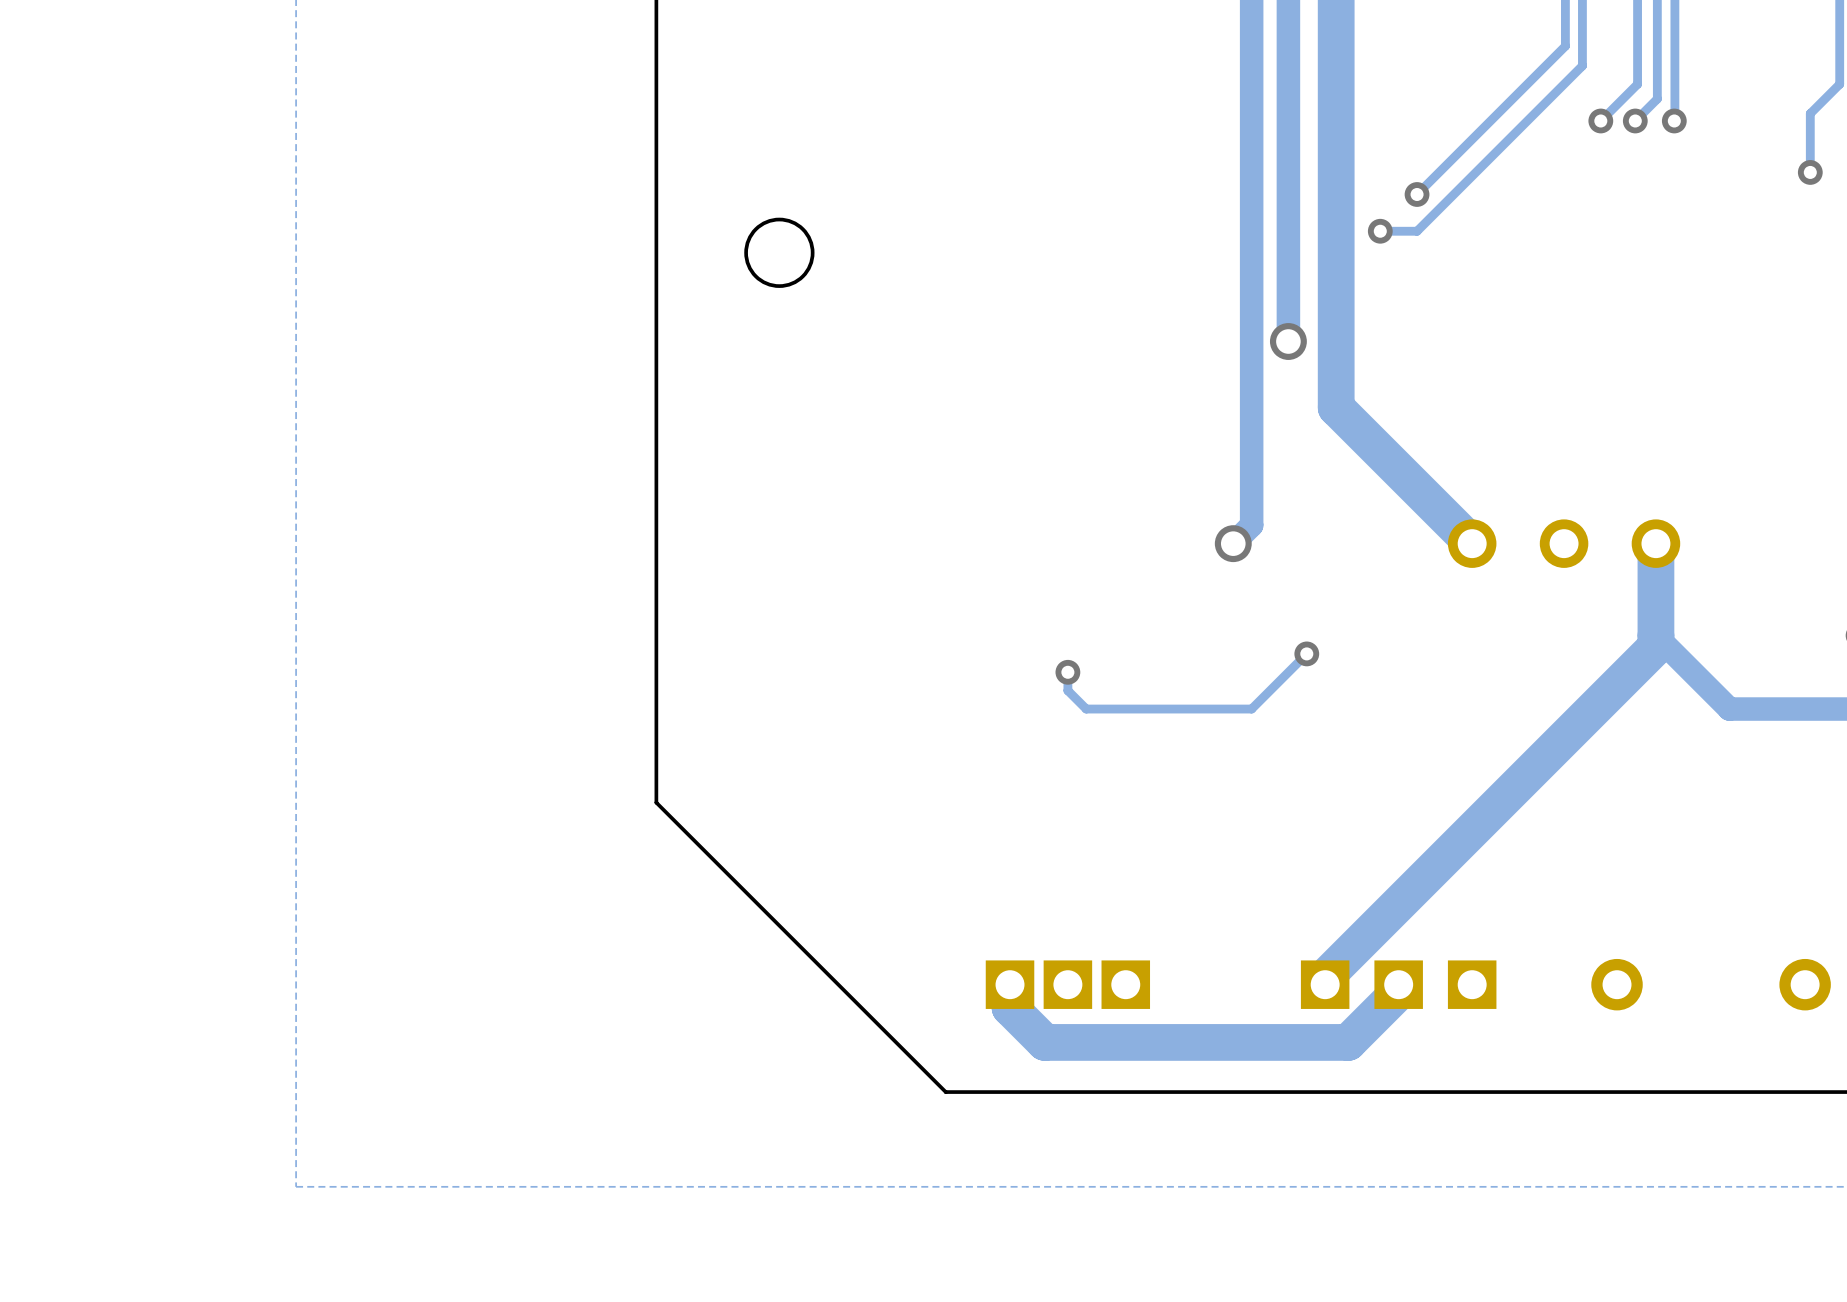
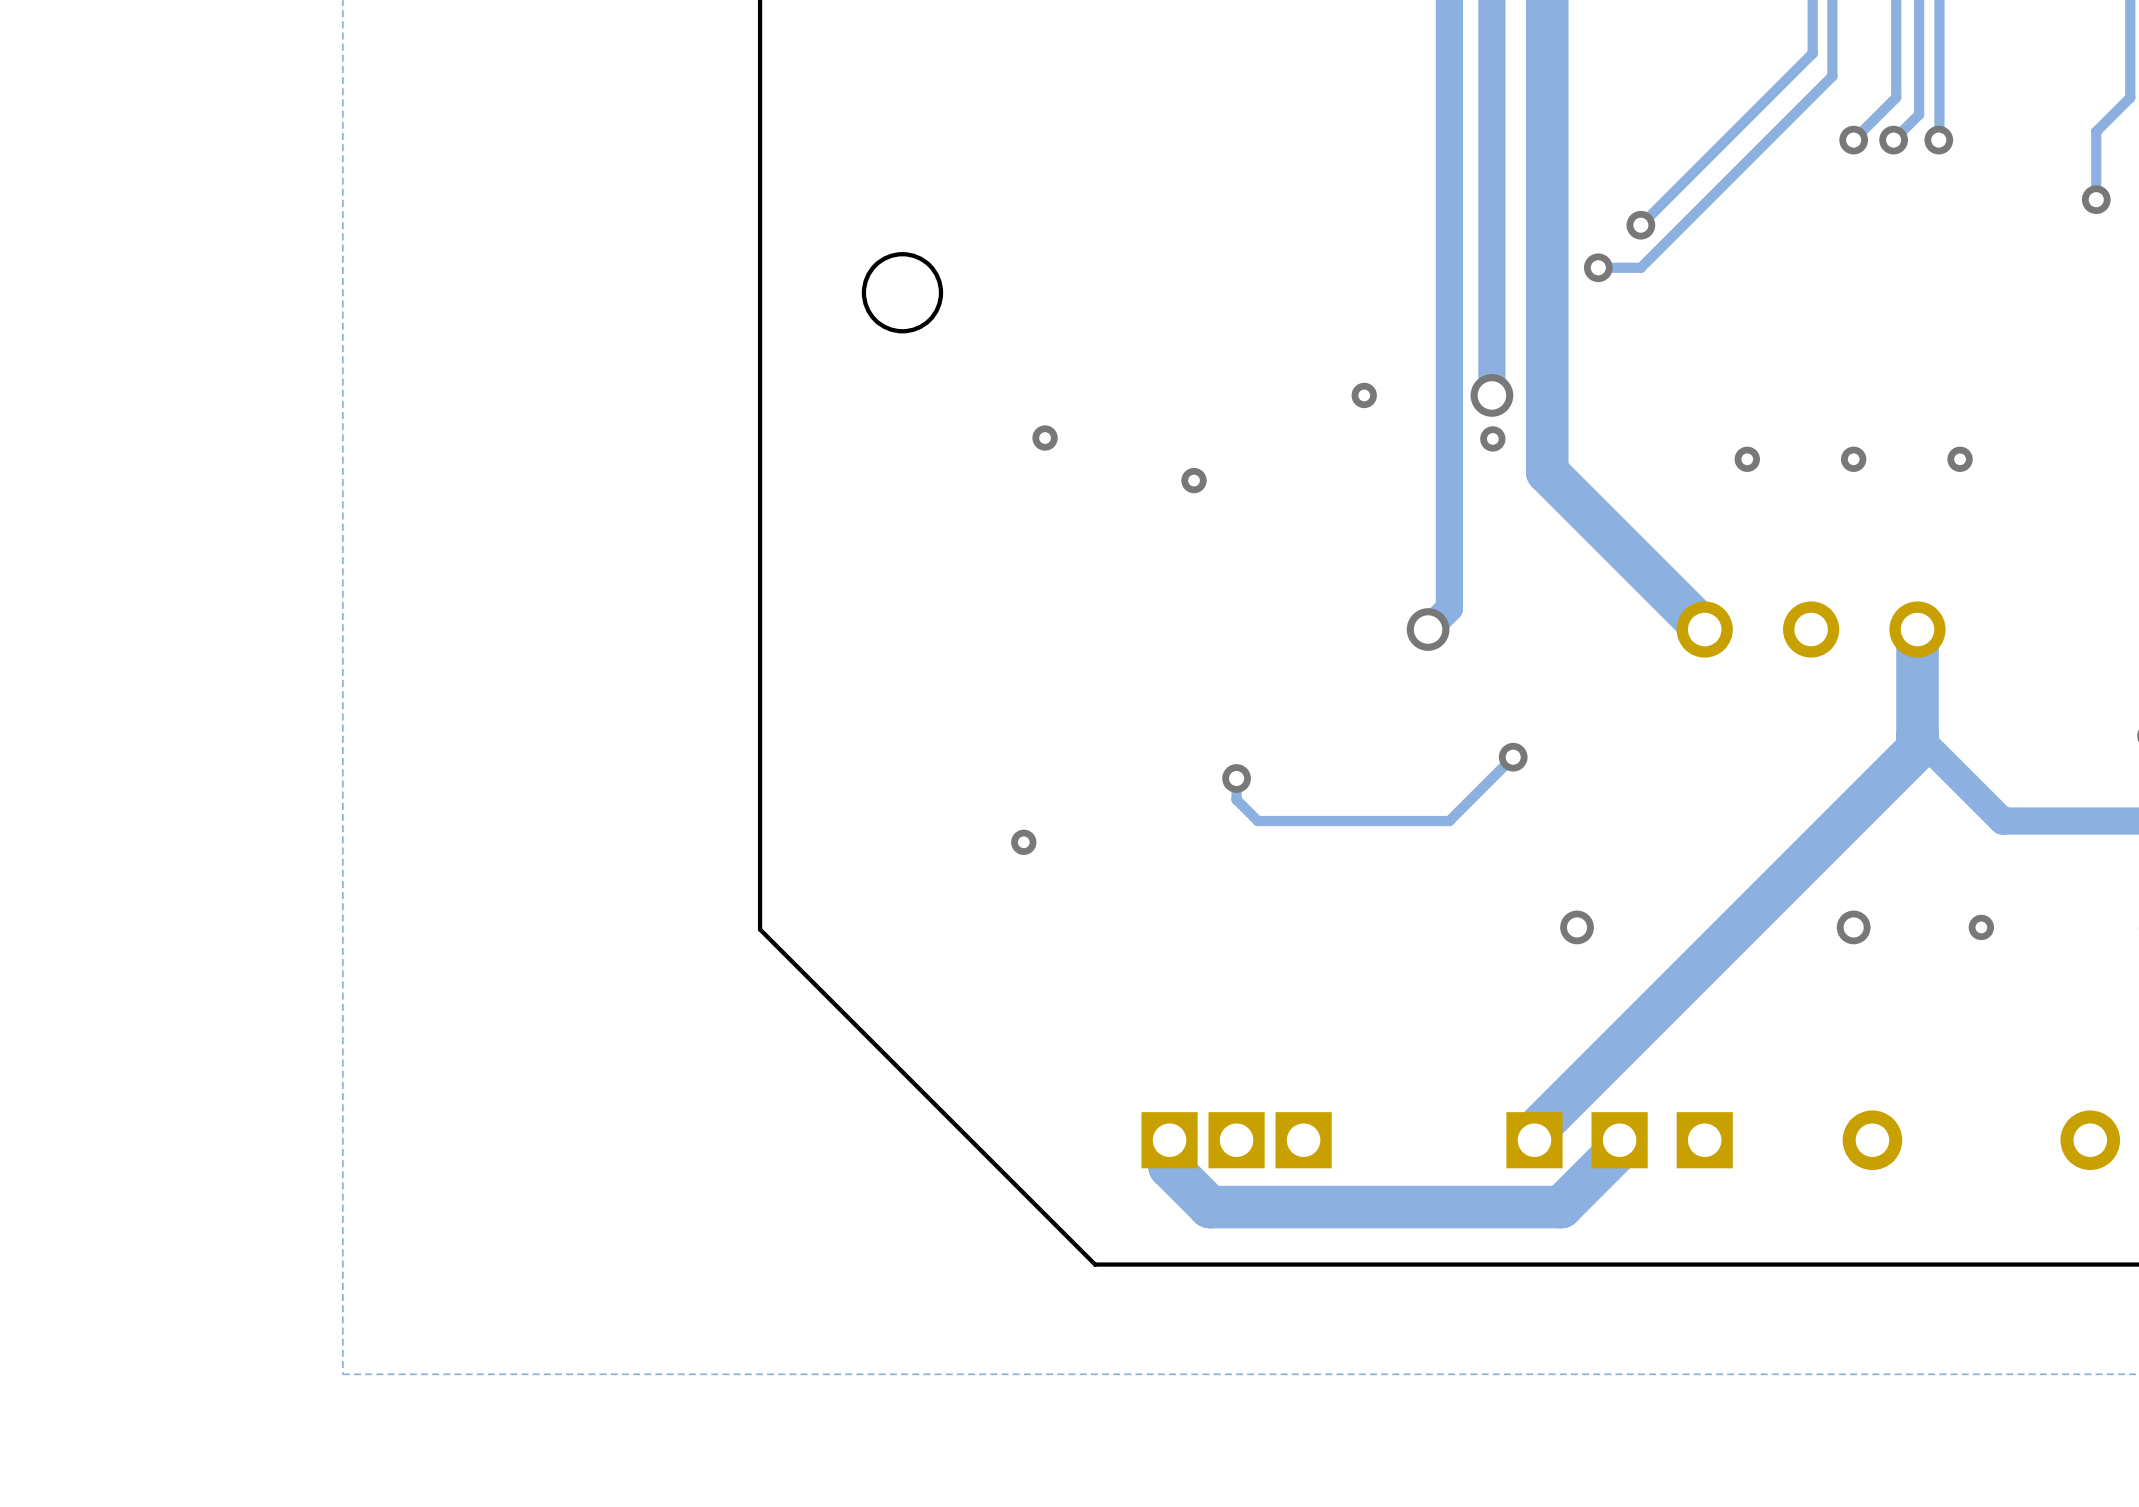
via: none -> (1364, 395)
via: none -> (1045, 438)
via: none -> (1492, 438)
via: none -> (1747, 459)
via: none -> (1853, 459)
via: none -> (1960, 459)
via: none -> (1194, 480)
via: none -> (1023, 842)
via: none -> (1577, 927)
via: none -> (1853, 927)
via: none -> (1981, 927)

